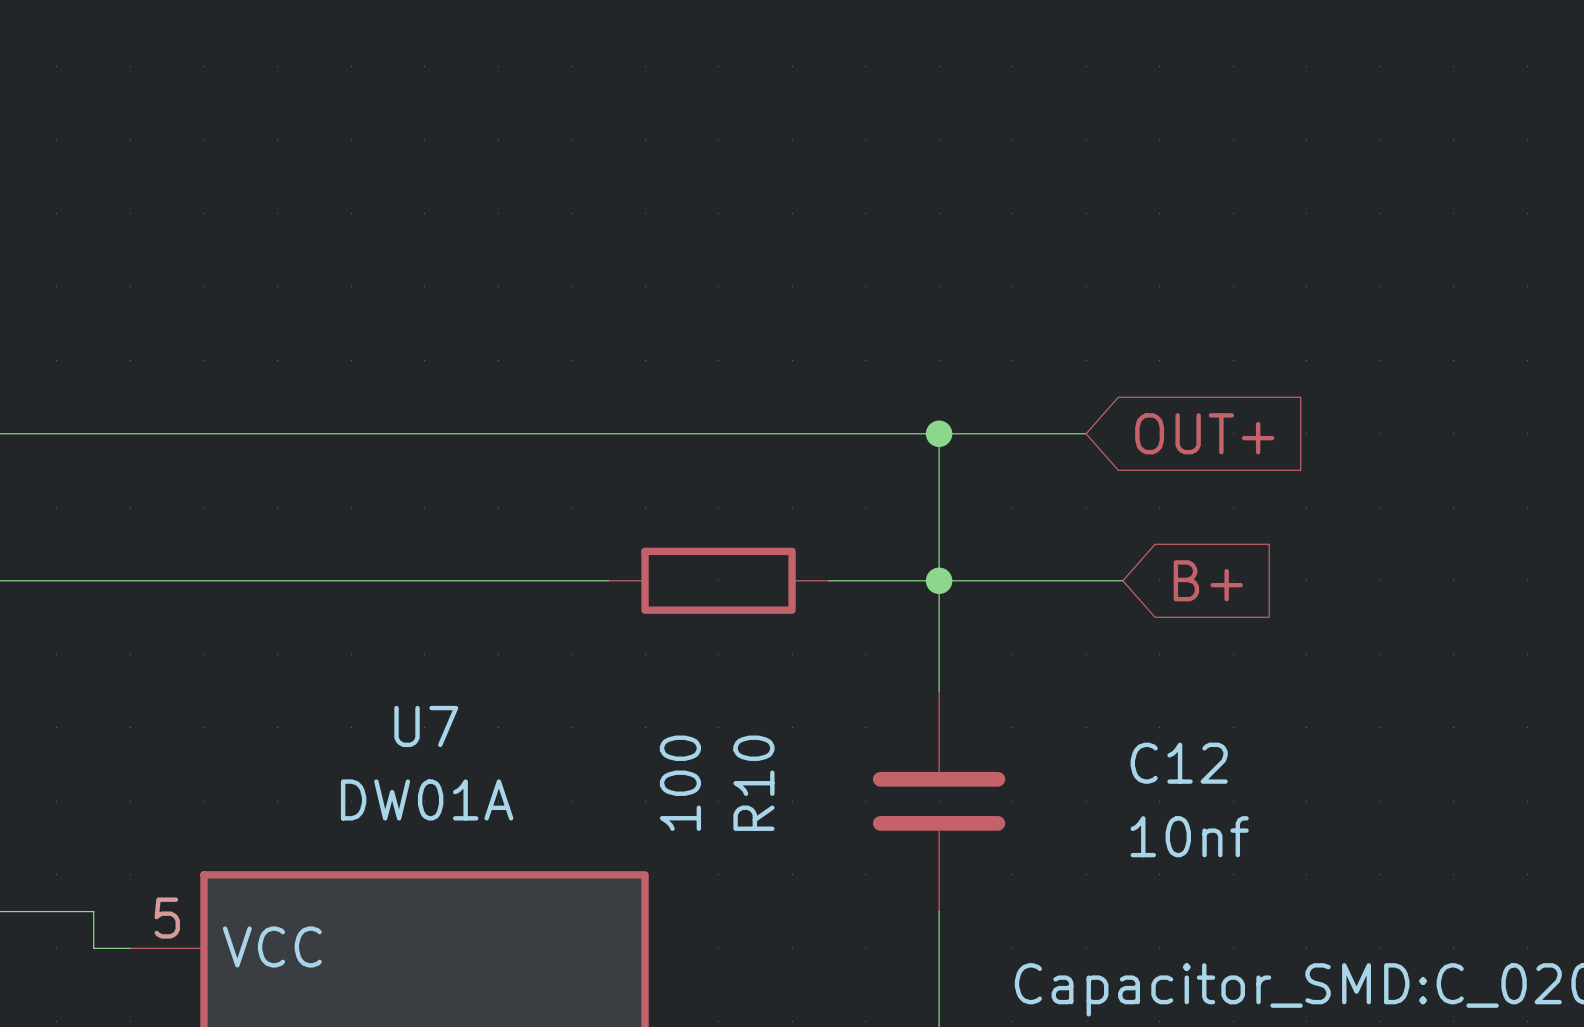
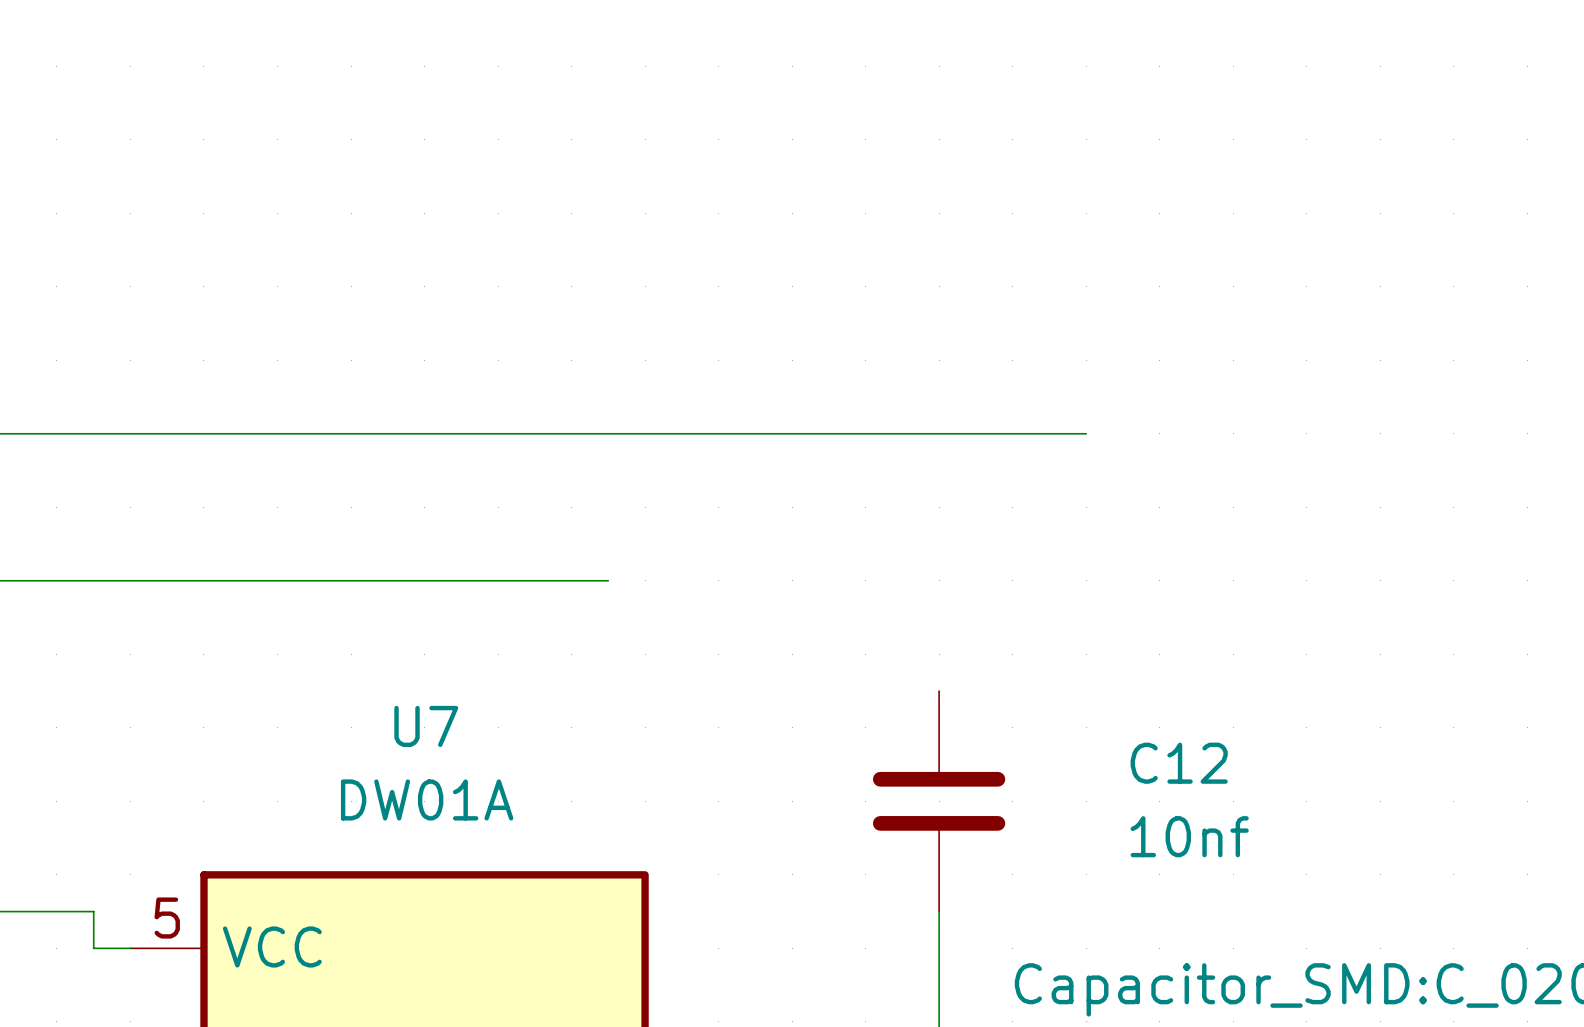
wire: (939, 433) (939, 691) -> none
junction: (939, 433) -> none
global label: OUT+ (1204, 433) -> none
R10: 100 (718, 580) -> none
wire: (828, 580) (1122, 580) -> none
junction: (939, 580) -> none
global label: B+ (1208, 580) -> none

